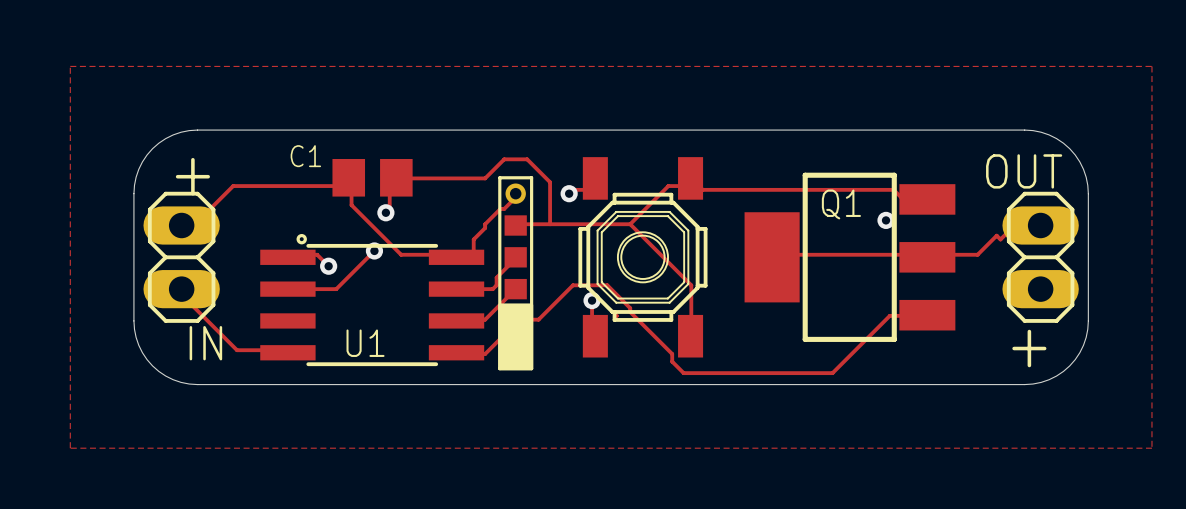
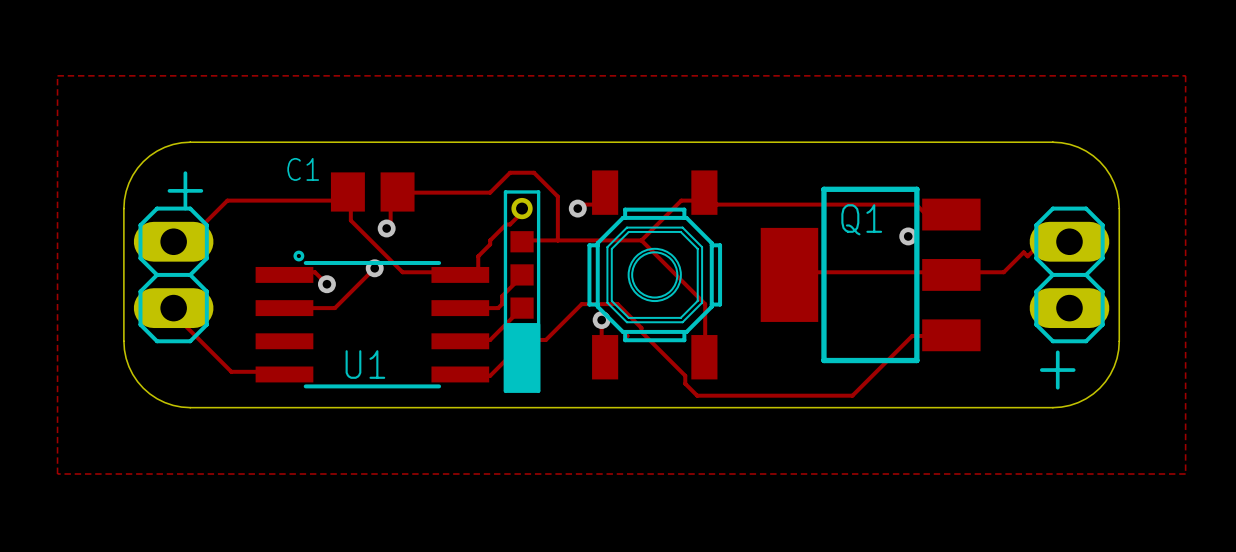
part value: OUT (1024, 171) -> none
part value: IN (205, 343) -> none

